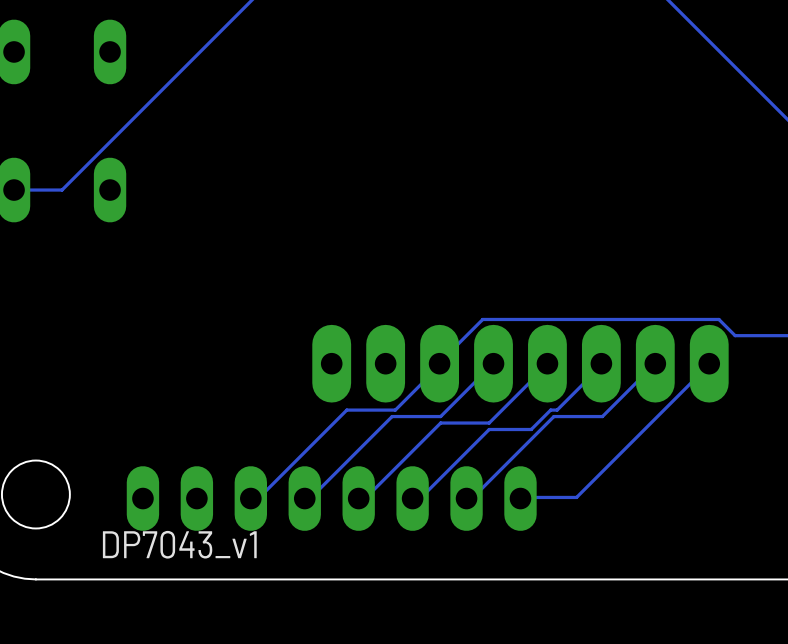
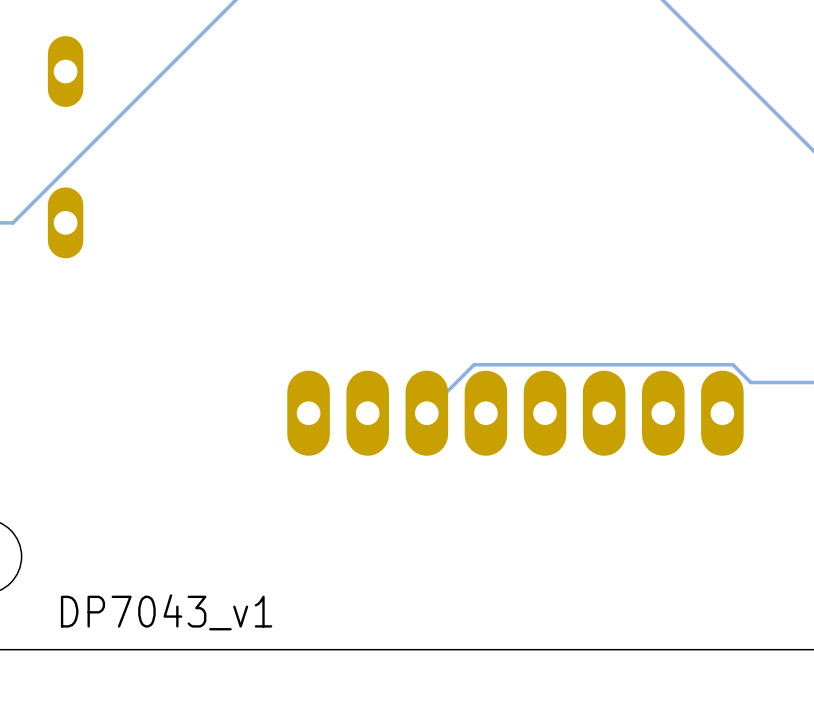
track: (439, 363) (440, 364) (395, 410) (346, 410) (259, 497) (250, 498) -> none
track: (493, 363) (440, 416) (392, 416) (311, 497) (304, 498) -> none
track: (547, 363) (489, 423) (440, 423) (366, 497) (358, 498) -> none
track: (601, 363) (602, 364) (557, 410) (550, 410) (531, 429) (489, 429) (421, 497) (412, 498) -> none
track: (655, 363) (602, 416) (553, 416) (473, 497) (466, 498) -> none
track: (709, 363) (576, 497) (520, 498) -> none
part: (331, 498) -> none

